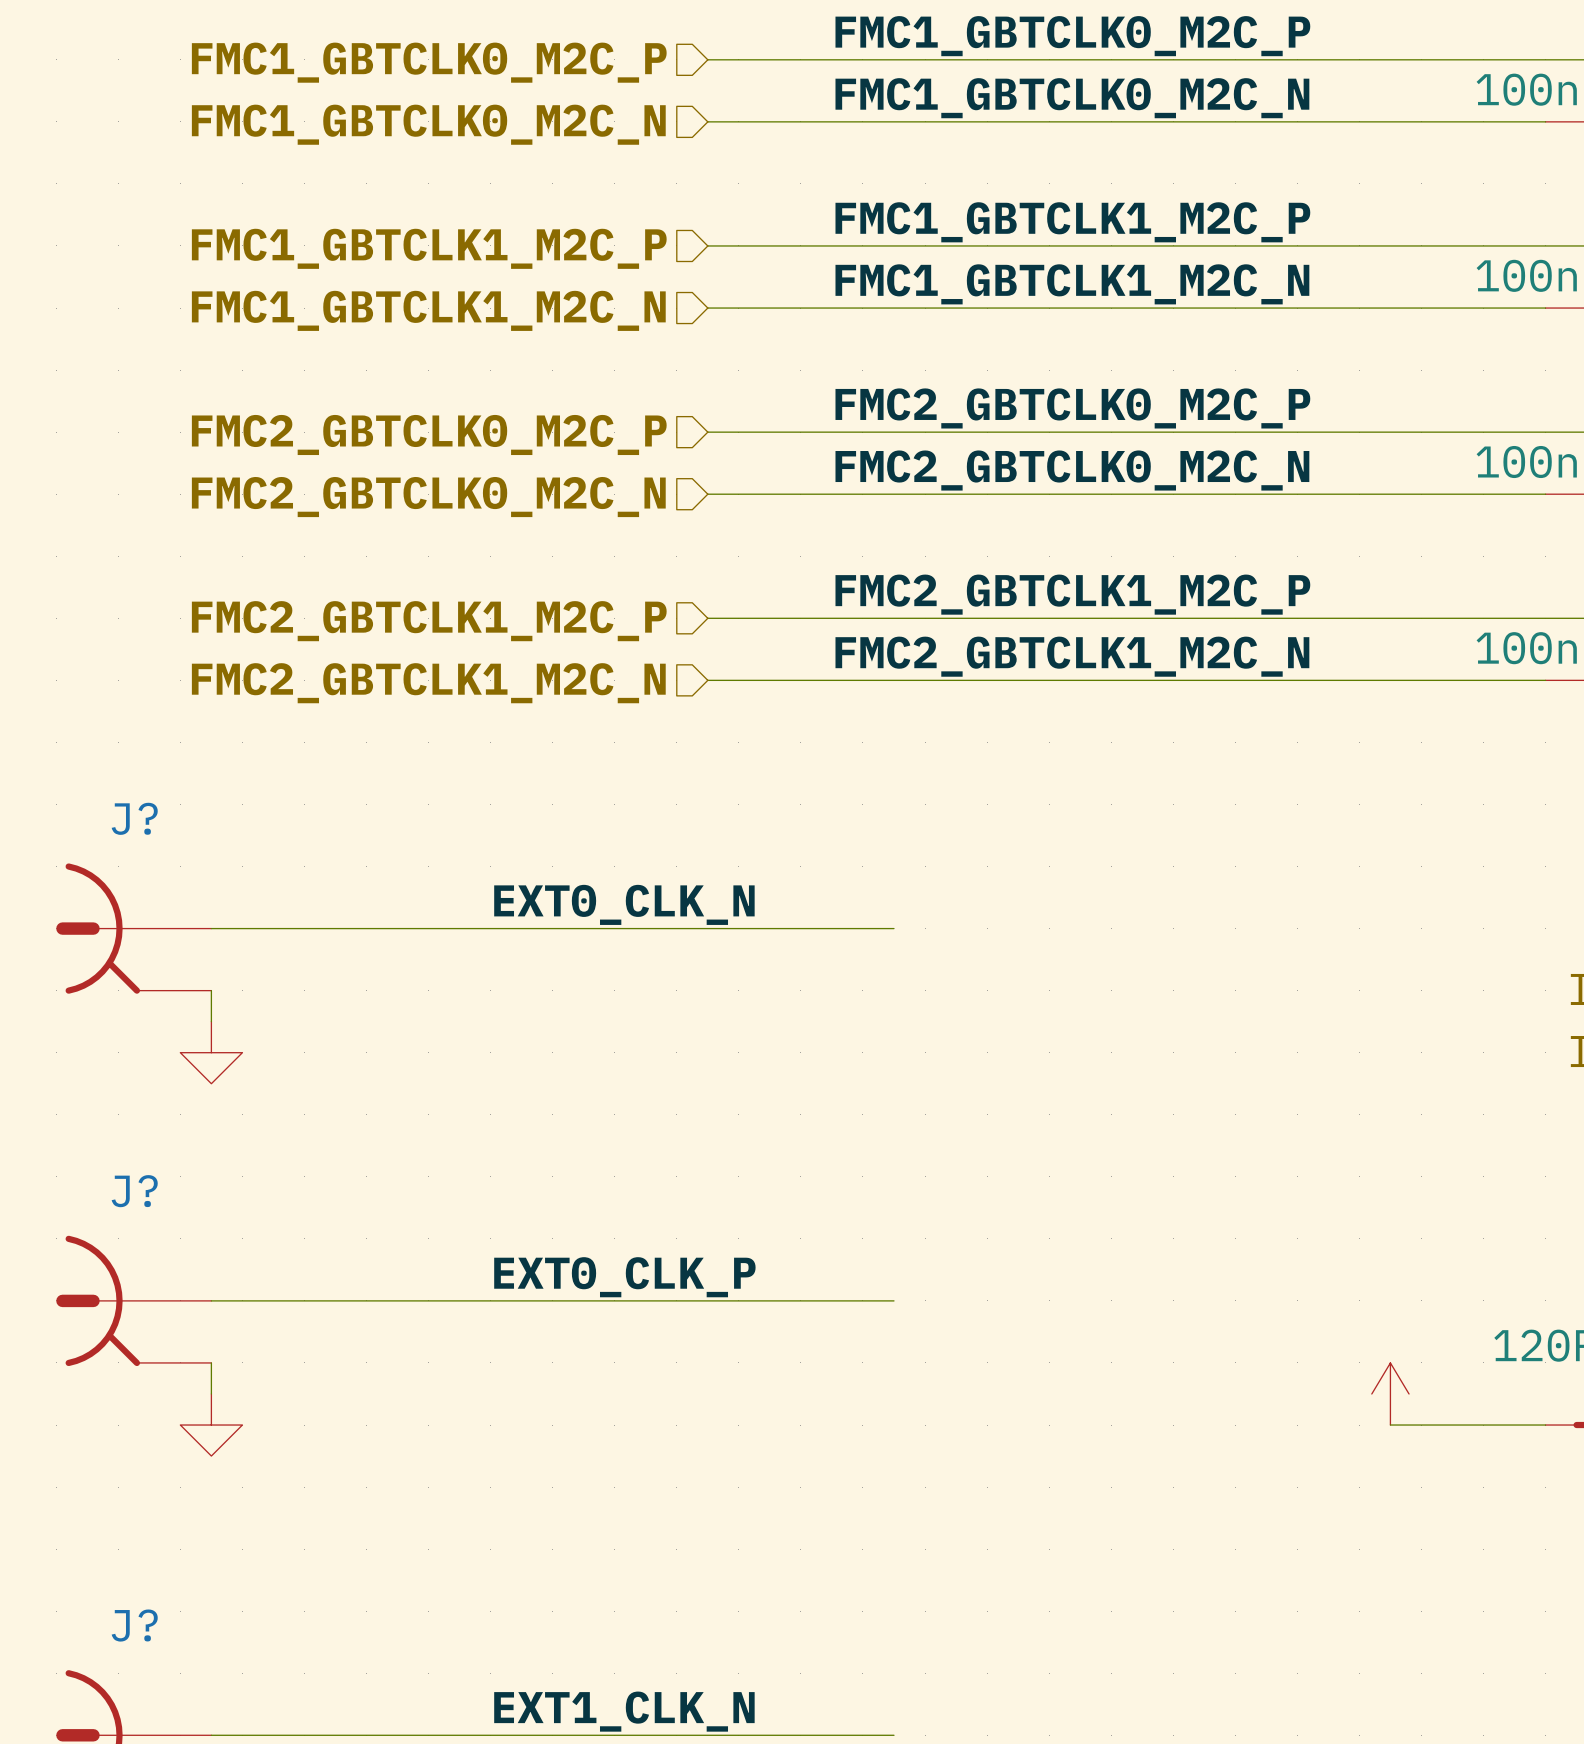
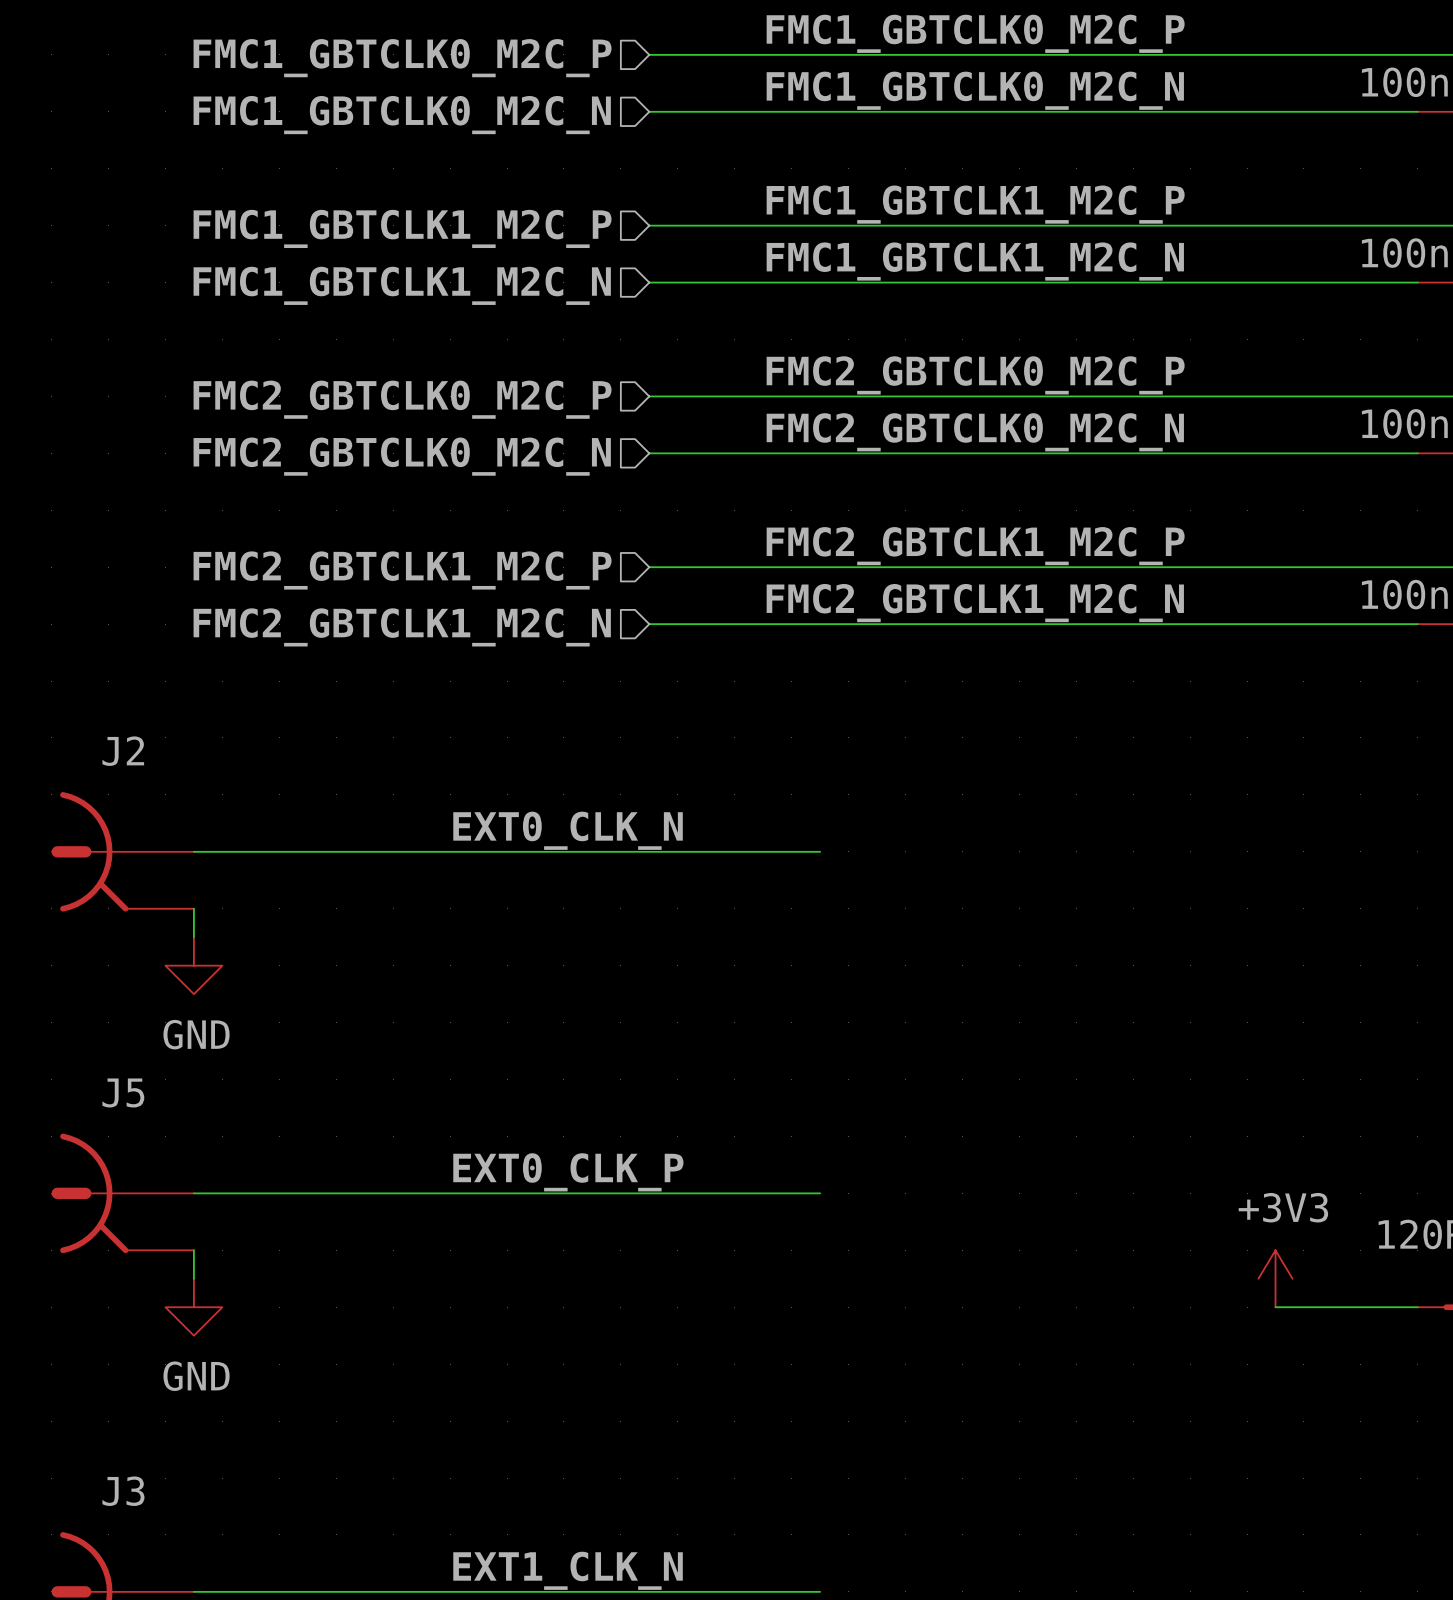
J? name: J? (134, 818) -> J2 (123, 751)
power symbol text: none -> GND (196, 1034)
J? name: J? (134, 1191) -> J5 (123, 1092)
power symbol text: none -> +3V3 (1283, 1207)
power symbol text: none -> GND (196, 1376)
J? name: J? (134, 1625) -> J3 (123, 1491)

